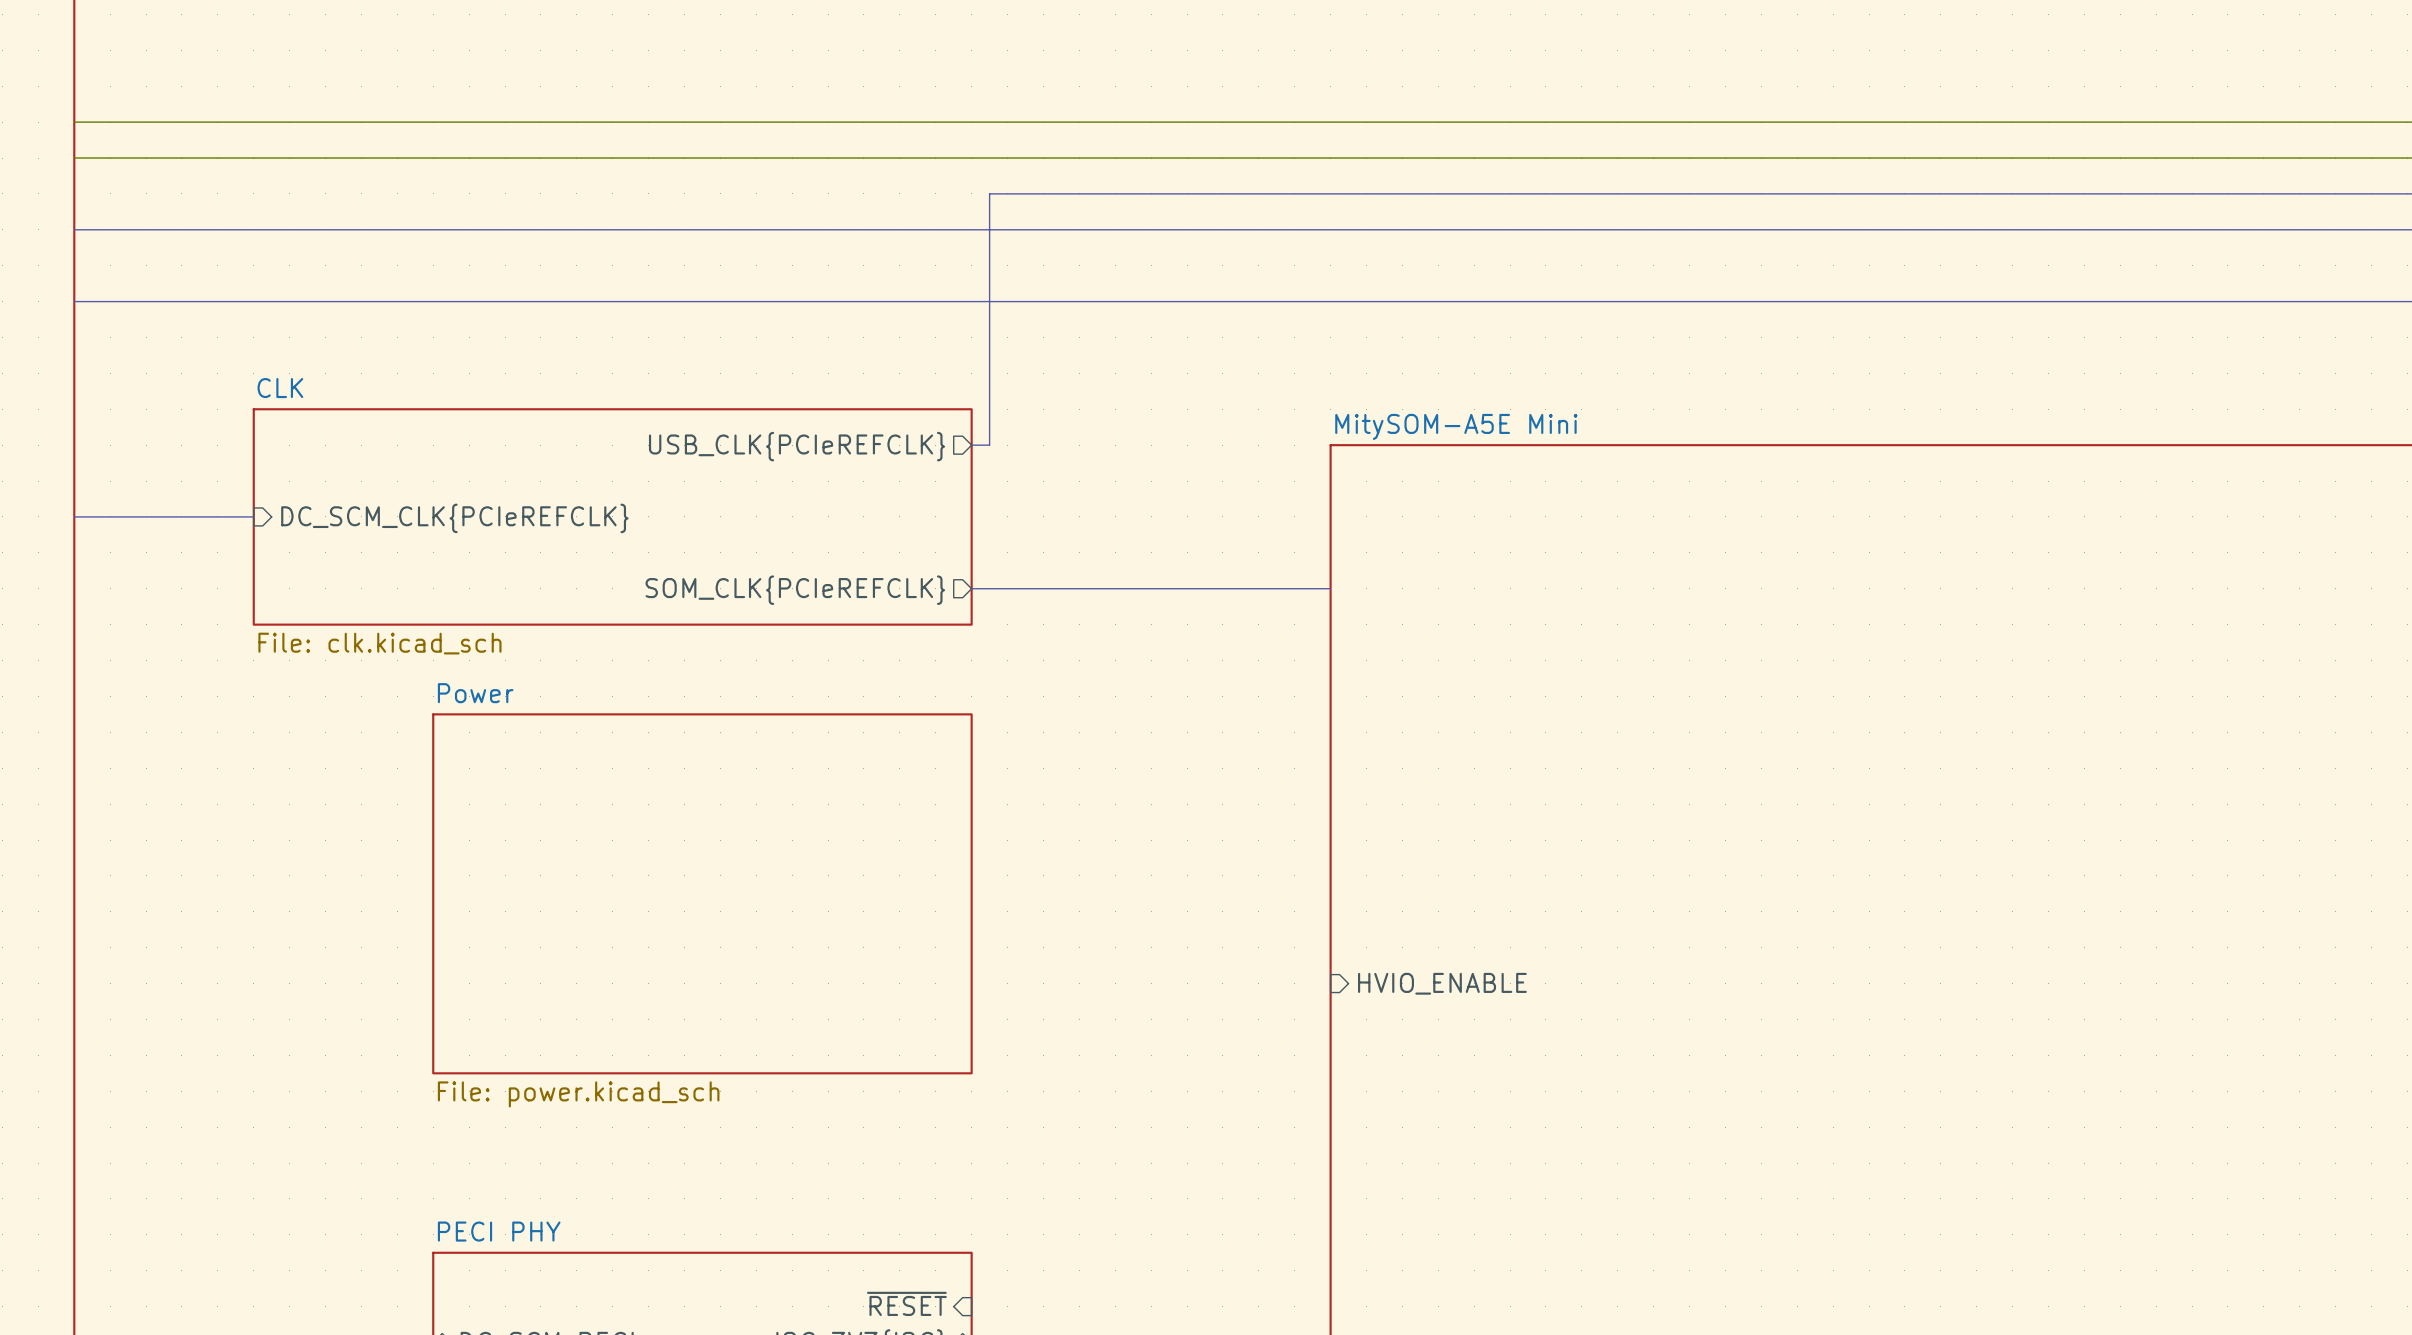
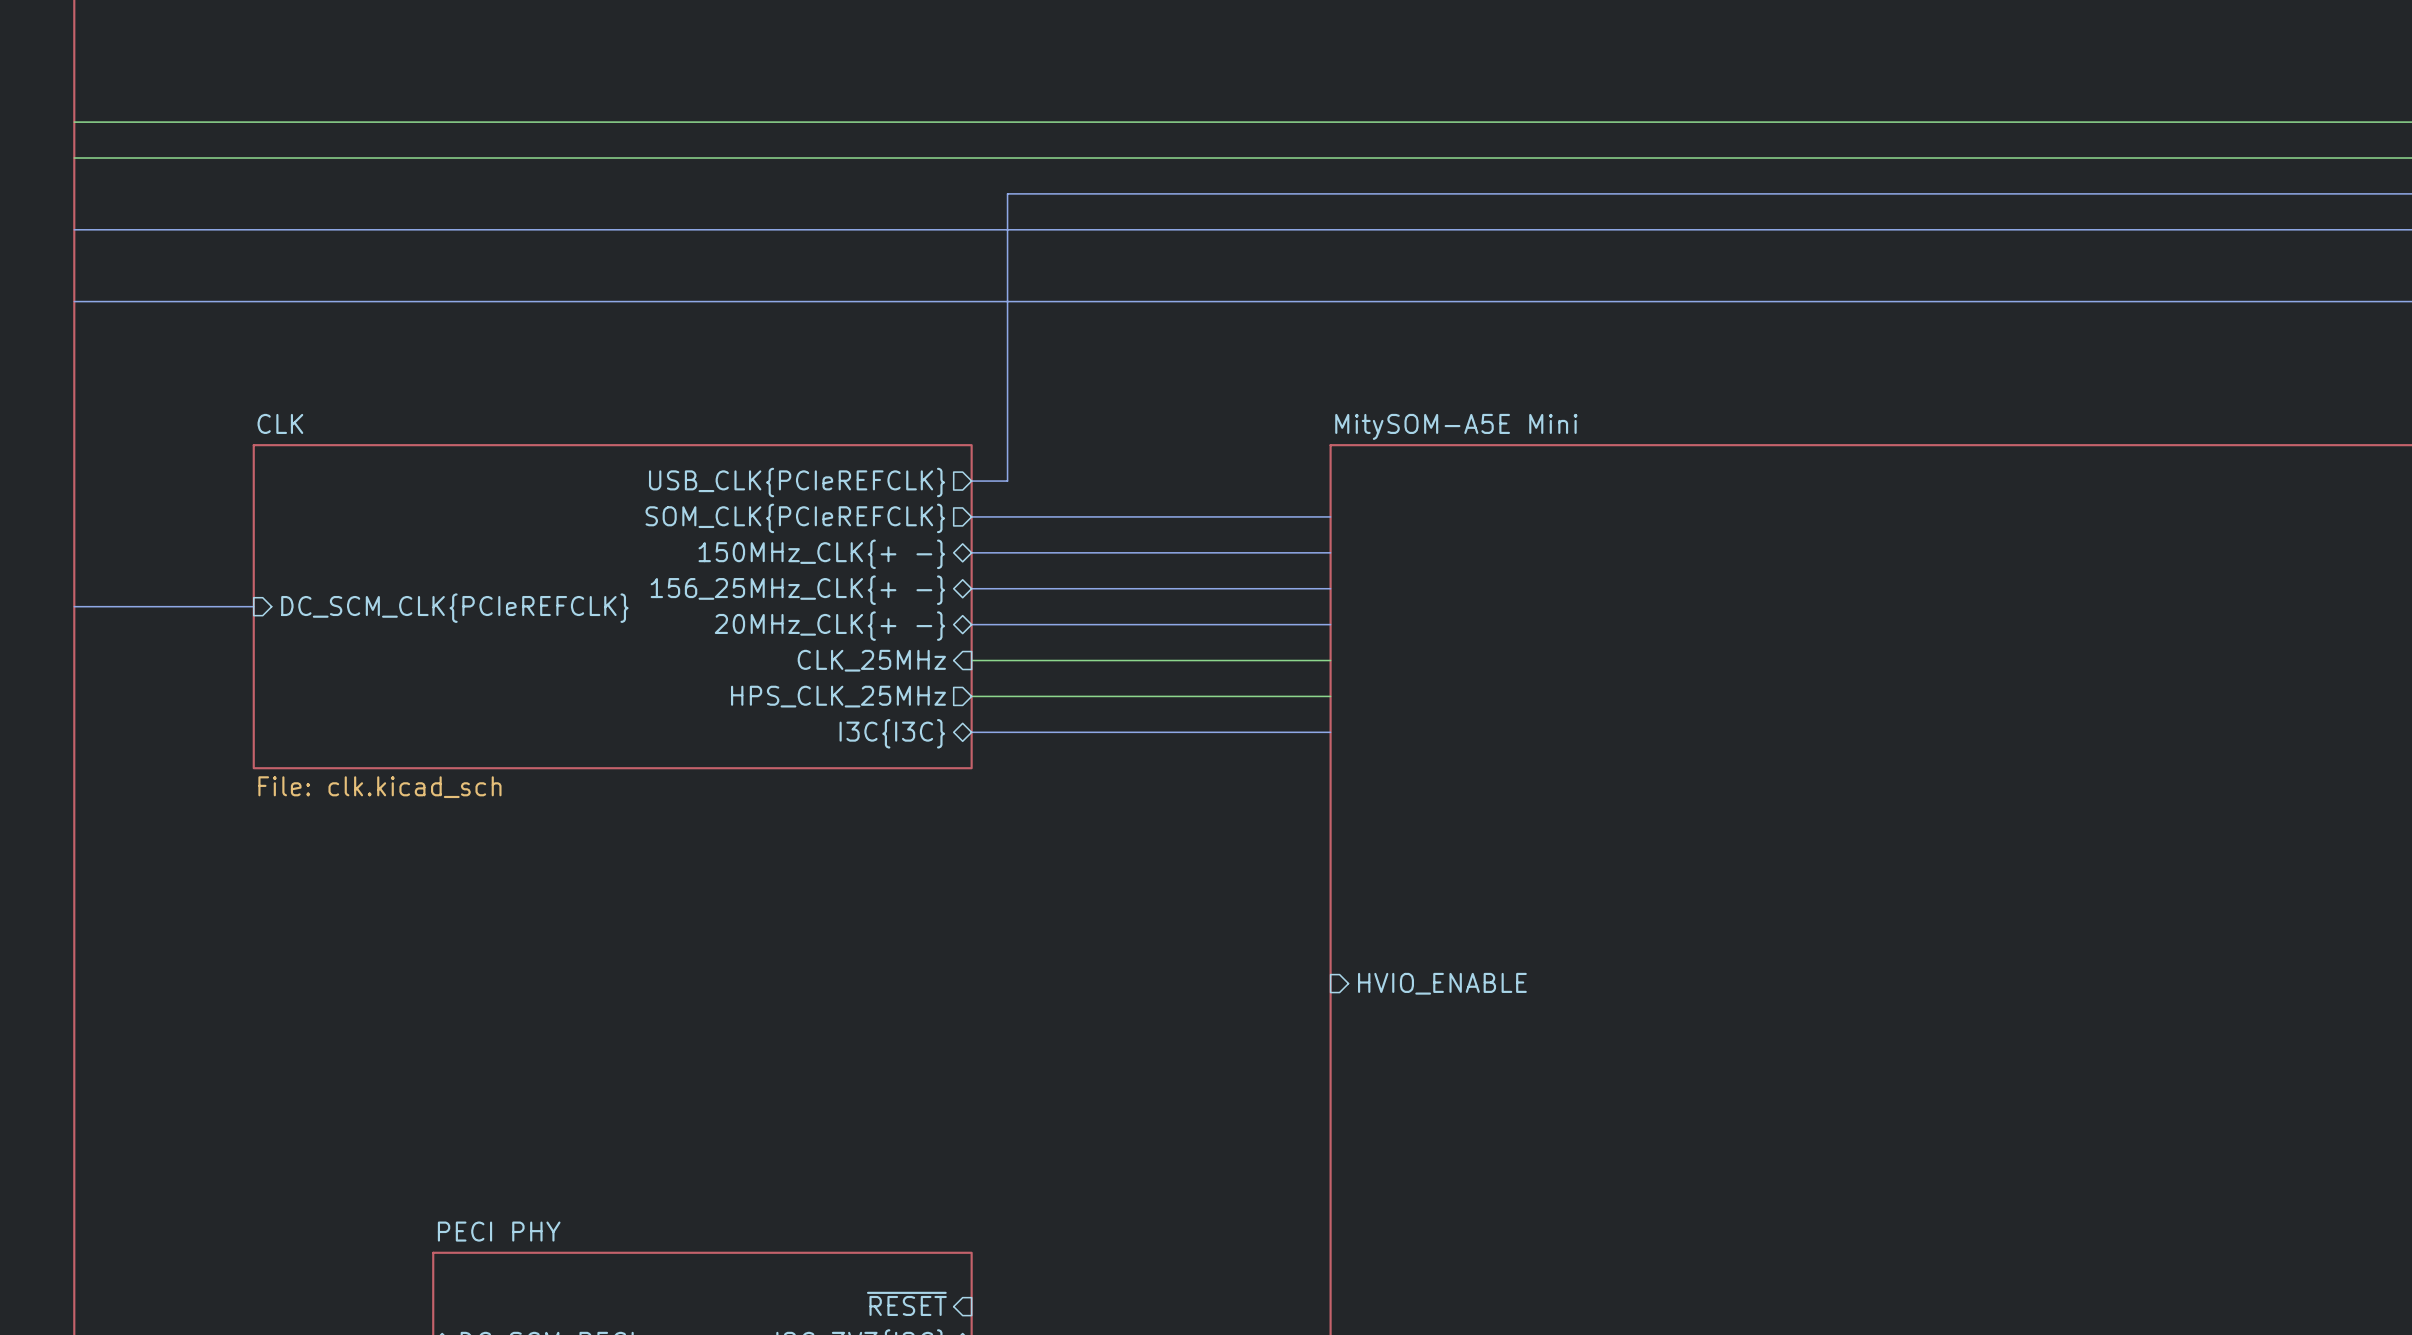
bus: (1007, 193) (989, 193) (989, 445) (971, 445) -> (1007, 193) (1007, 481) (971, 481)
sheet pin position: USB_CLK{PCIeREFCLK} (797, 446) -> USB_CLK{PCIeREFCLK} (797, 482)
bus: (74, 516) (253, 516) -> (74, 606) (253, 606)
sheet CLK: File: clk.kicad_sch (612, 516) -> none
bus: none -> (971, 516) (1330, 516)
sheet pin position: DC_SCM_CLK{PCIeREFCLK} (454, 518) -> DC_SCM_CLK{PCIeREFCLK} (454, 608)
sheet pin: none -> SOM_CLK{PCIeREFCLK} (795, 518)
bus: none -> (971, 552) (1330, 552)
sheet pin: none -> 150MHz_CLK{+ -} (821, 554)
sheet pin shape: output (795, 590) -> bidirectional (797, 590)
sheet pin: SOM_CLK{PCIeREFCLK} (795, 590) -> 156_25MHz_CLK{+ -} (797, 590)
sheet CLK: none -> File: clk.kicad_sch (612, 606)
bus: none -> (971, 624) (1330, 624)
sheet pin: none -> 20MHz_CLK{+ -} (829, 626)
sheet pin: none -> CLK_25MHz (871, 660)
wire: none -> (971, 660) (1330, 660)
sheet pin: none -> HPS_CLK_25MHz (838, 696)
wire: none -> (971, 696) (1330, 696)
bus: none -> (971, 732) (1330, 732)
sheet pin: none -> I3C{I3C} (892, 733)
sheet Power: File: power.kicad_sch (702, 893) -> none

